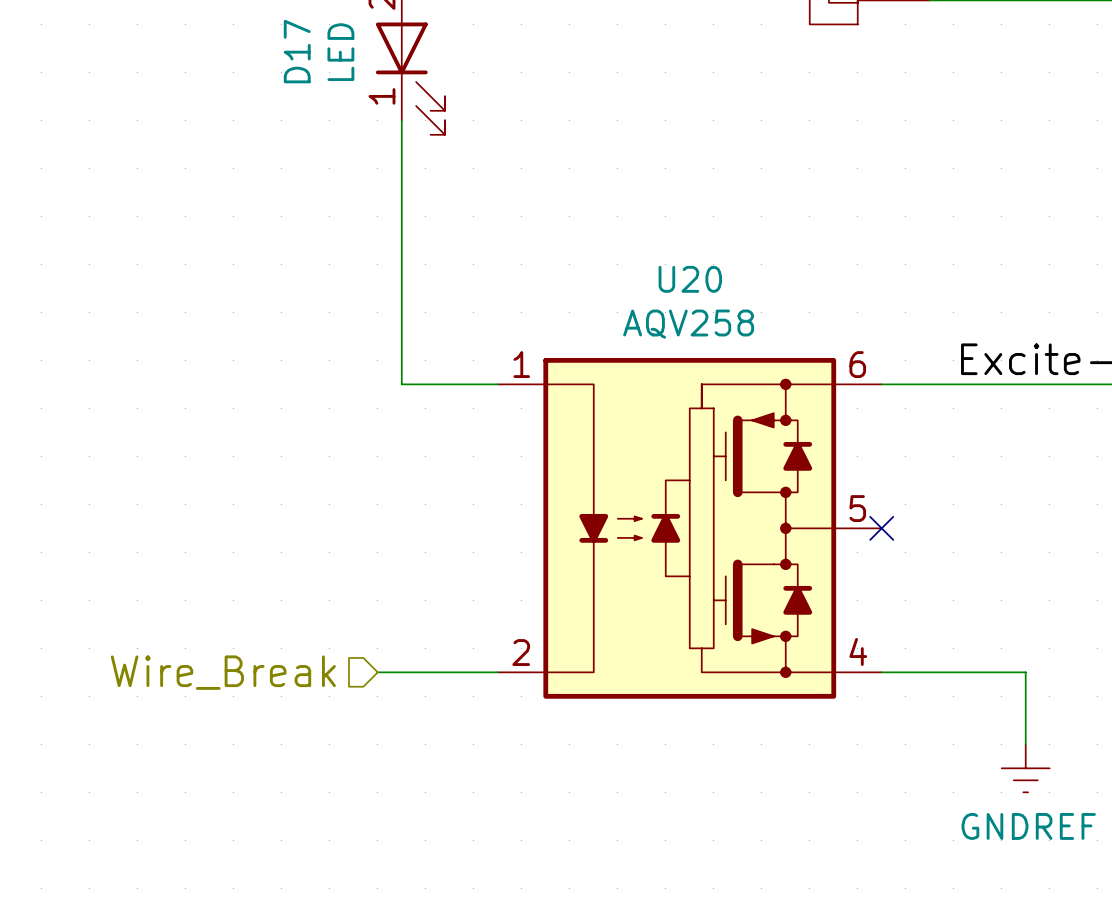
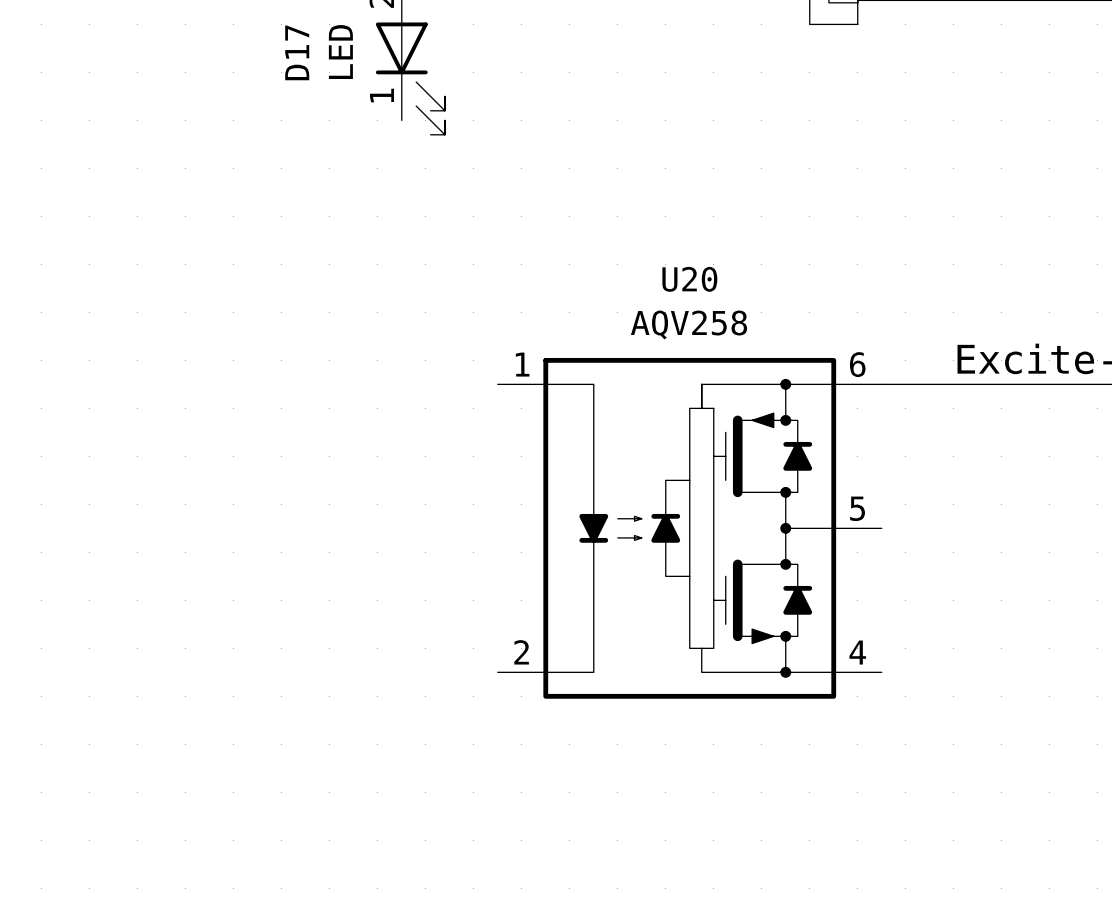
wire: (401, 120) (401, 384) (497, 384) -> none
no-connect mark: (881, 528) -> none
hierarchical label: Wire_Break (223, 672) -> none
wire: (377, 672) (497, 672) -> none
wire: (881, 672) (1025, 672) (1025, 744) -> none
power symbol: GNDREF (1025, 768) -> none

